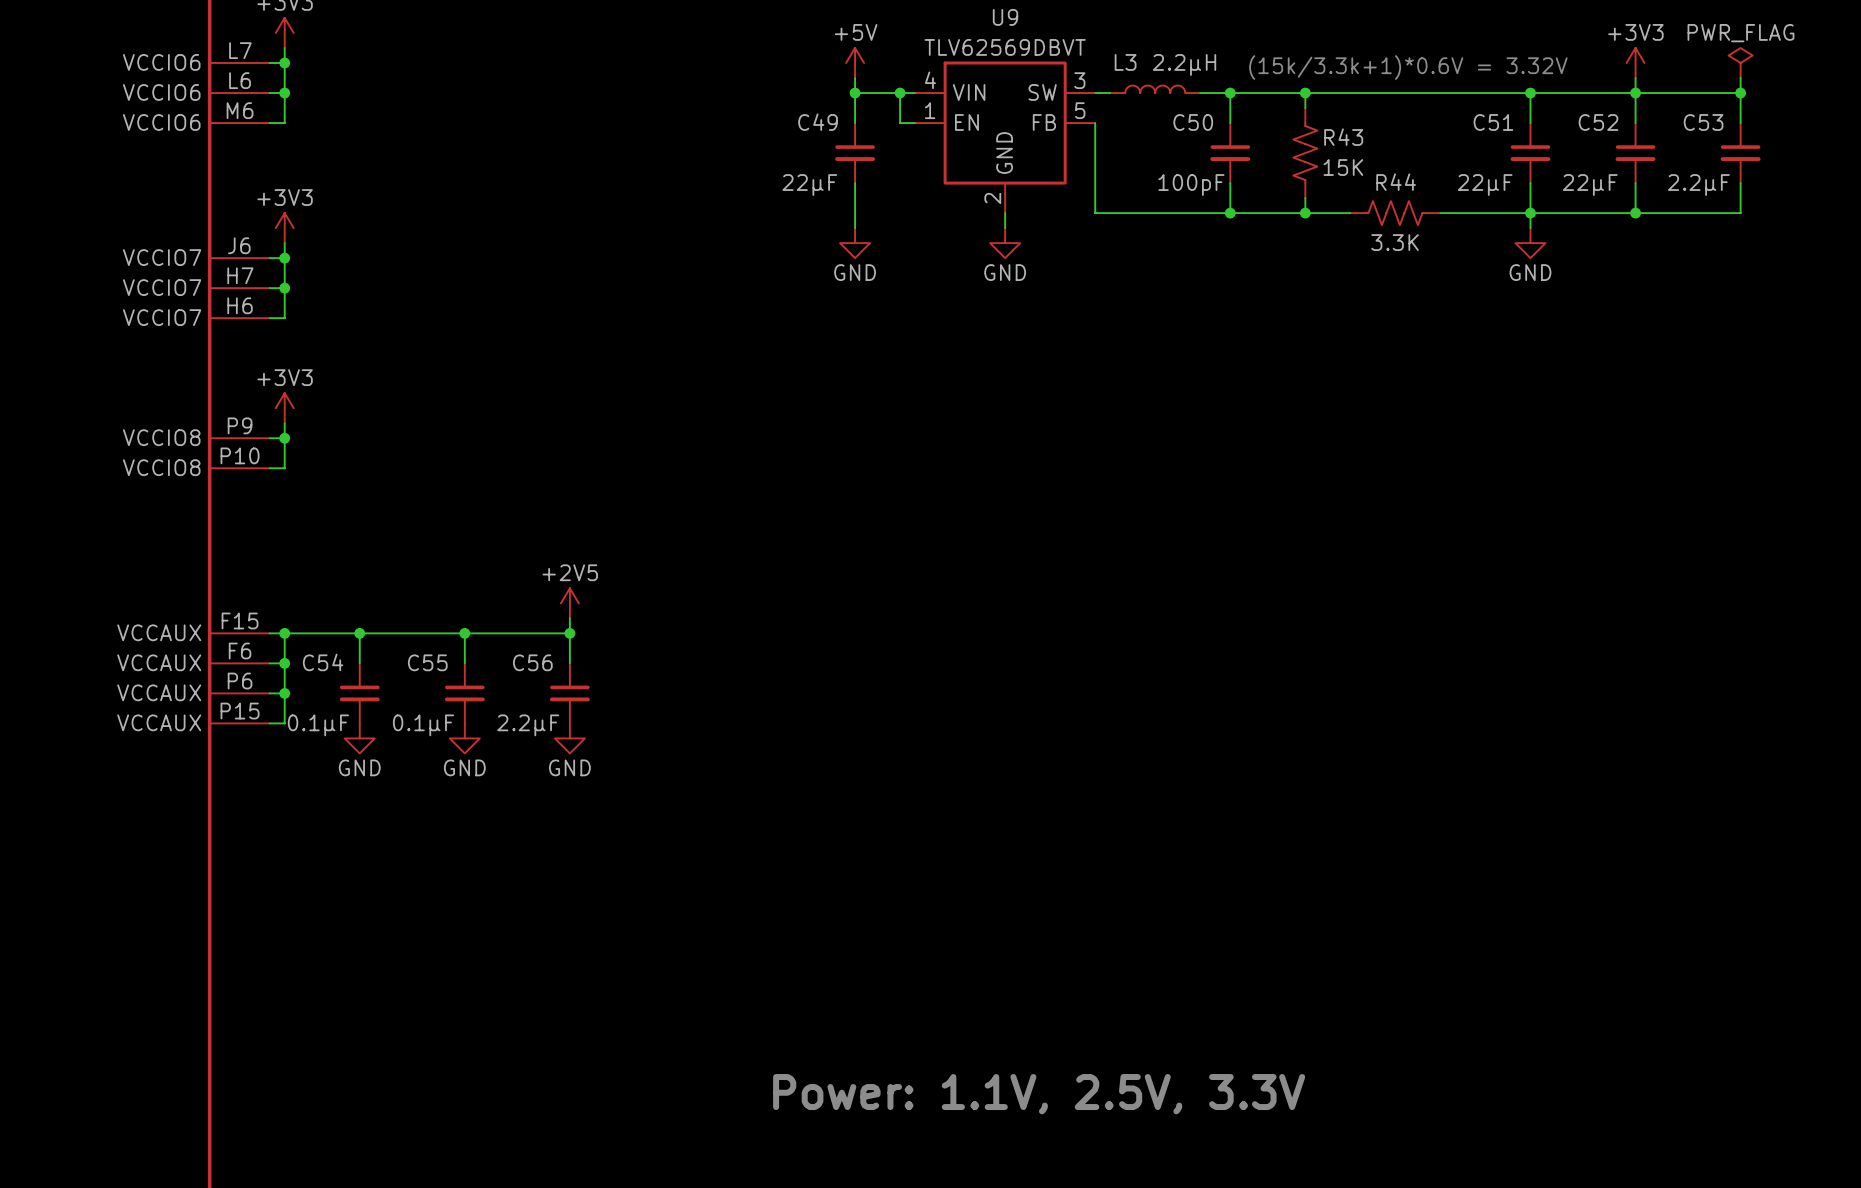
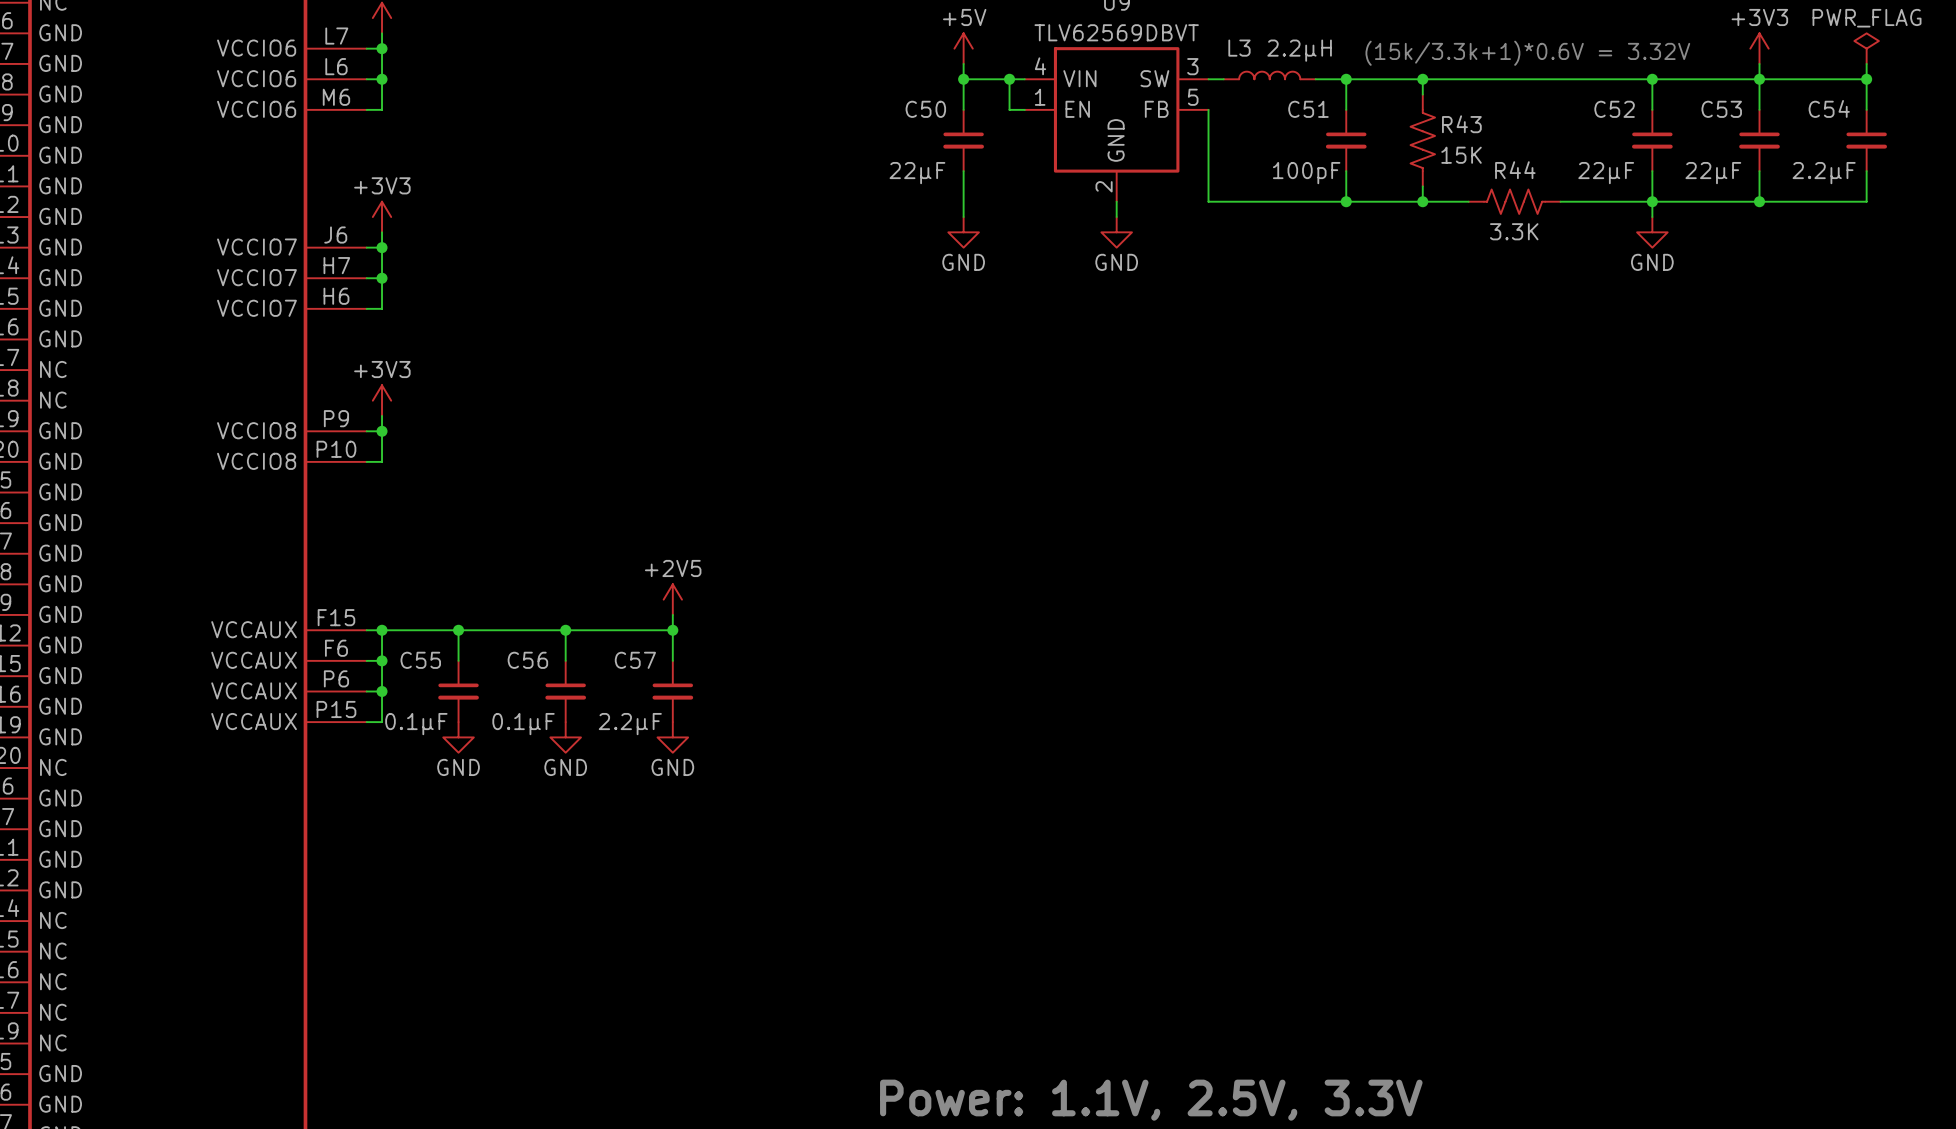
C49 name: C49 (818, 122) -> C50 (925, 109)
C50 name: C50 (1193, 122) -> C51 (1308, 109)
C51 name: C51 (1493, 122) -> C52 (1614, 109)
C52 name: C52 (1598, 122) -> C53 (1721, 109)
C53 name: C53 (1703, 122) -> C54 (1829, 108)
C54 name: C54 (323, 662) -> C55 (420, 660)
C55 name: C55 (427, 662) -> C56 (527, 660)
C56 name: C56 (532, 662) -> C57 (635, 660)

